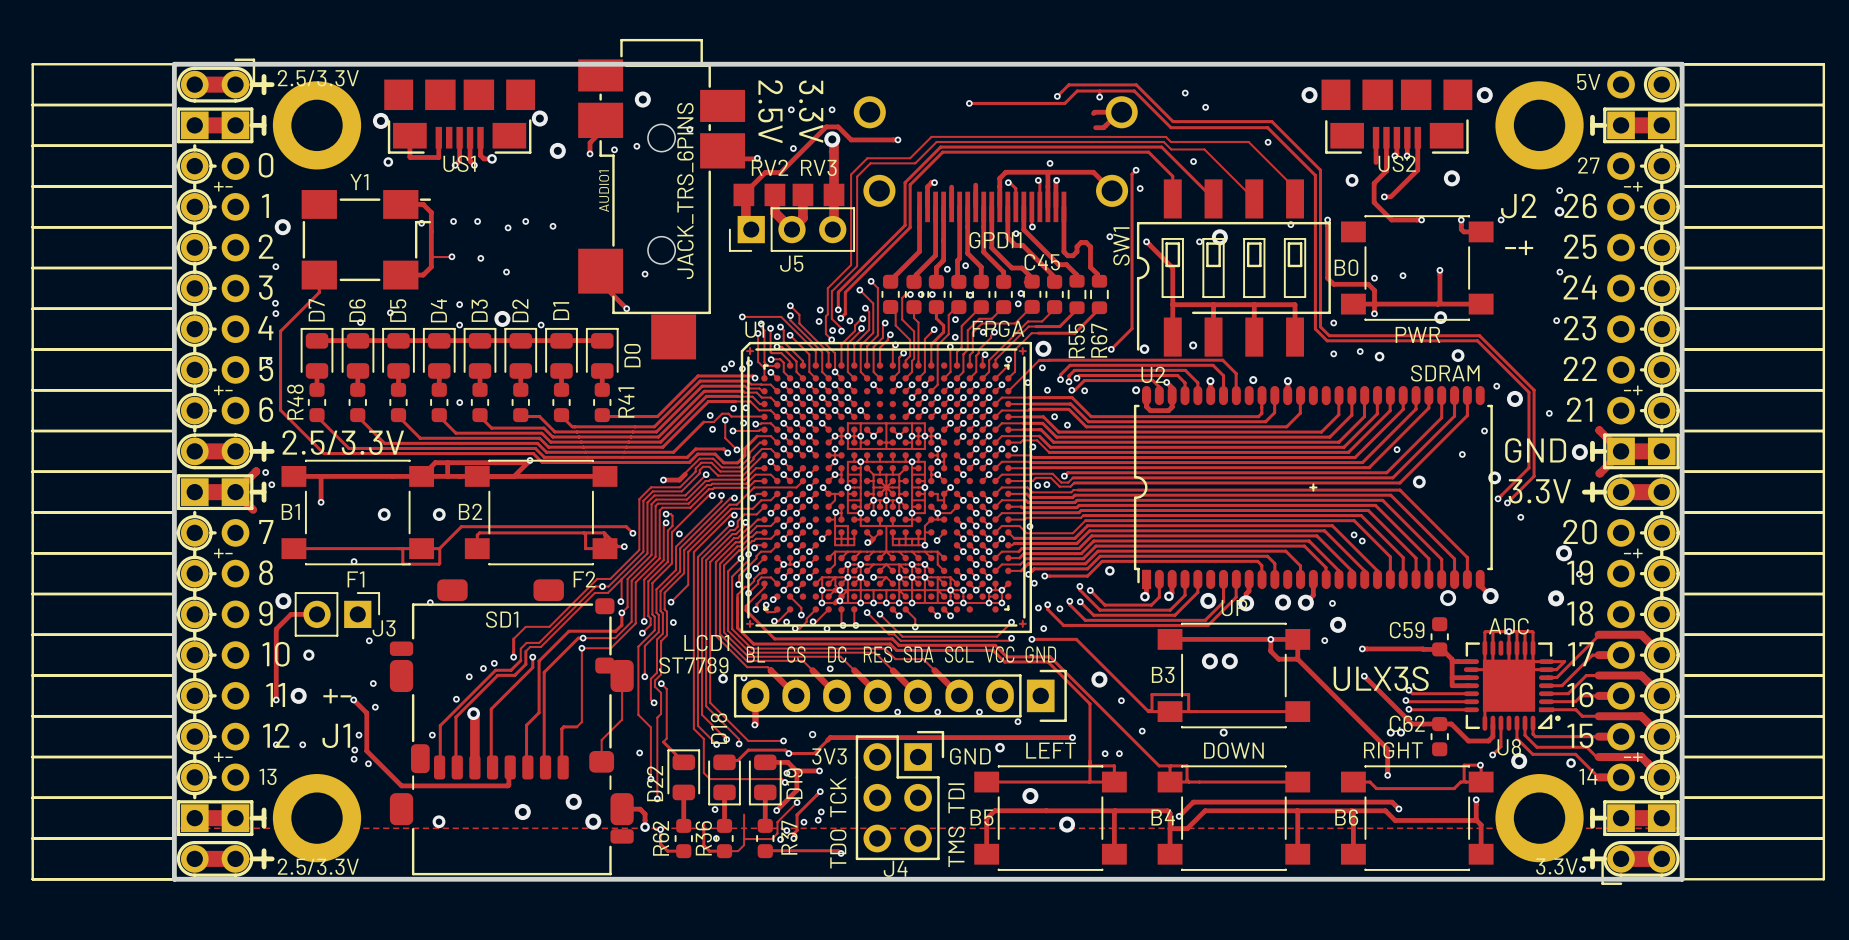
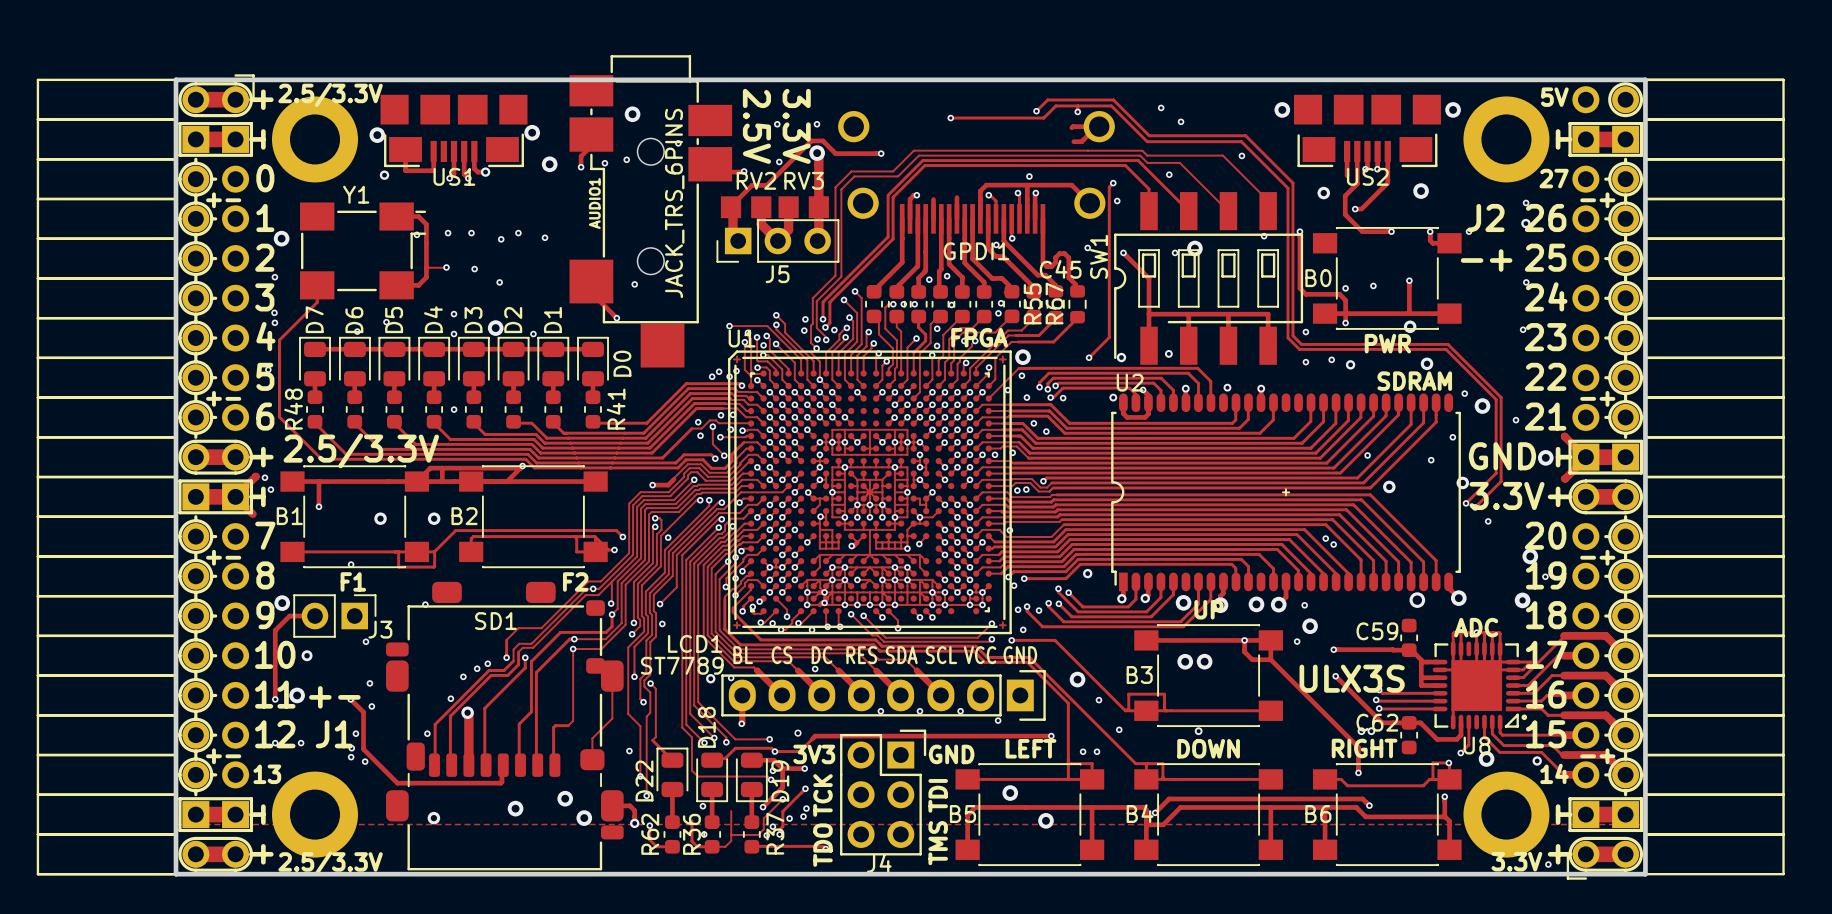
C45 name position: C45 (1042, 262) -> C45 (1060, 269)
R55 name position: R55 (1076, 340) -> R55 (1032, 303)
R67 name position: R67 (1099, 340) -> R67 (1054, 303)
via: (999, 747) -> none

